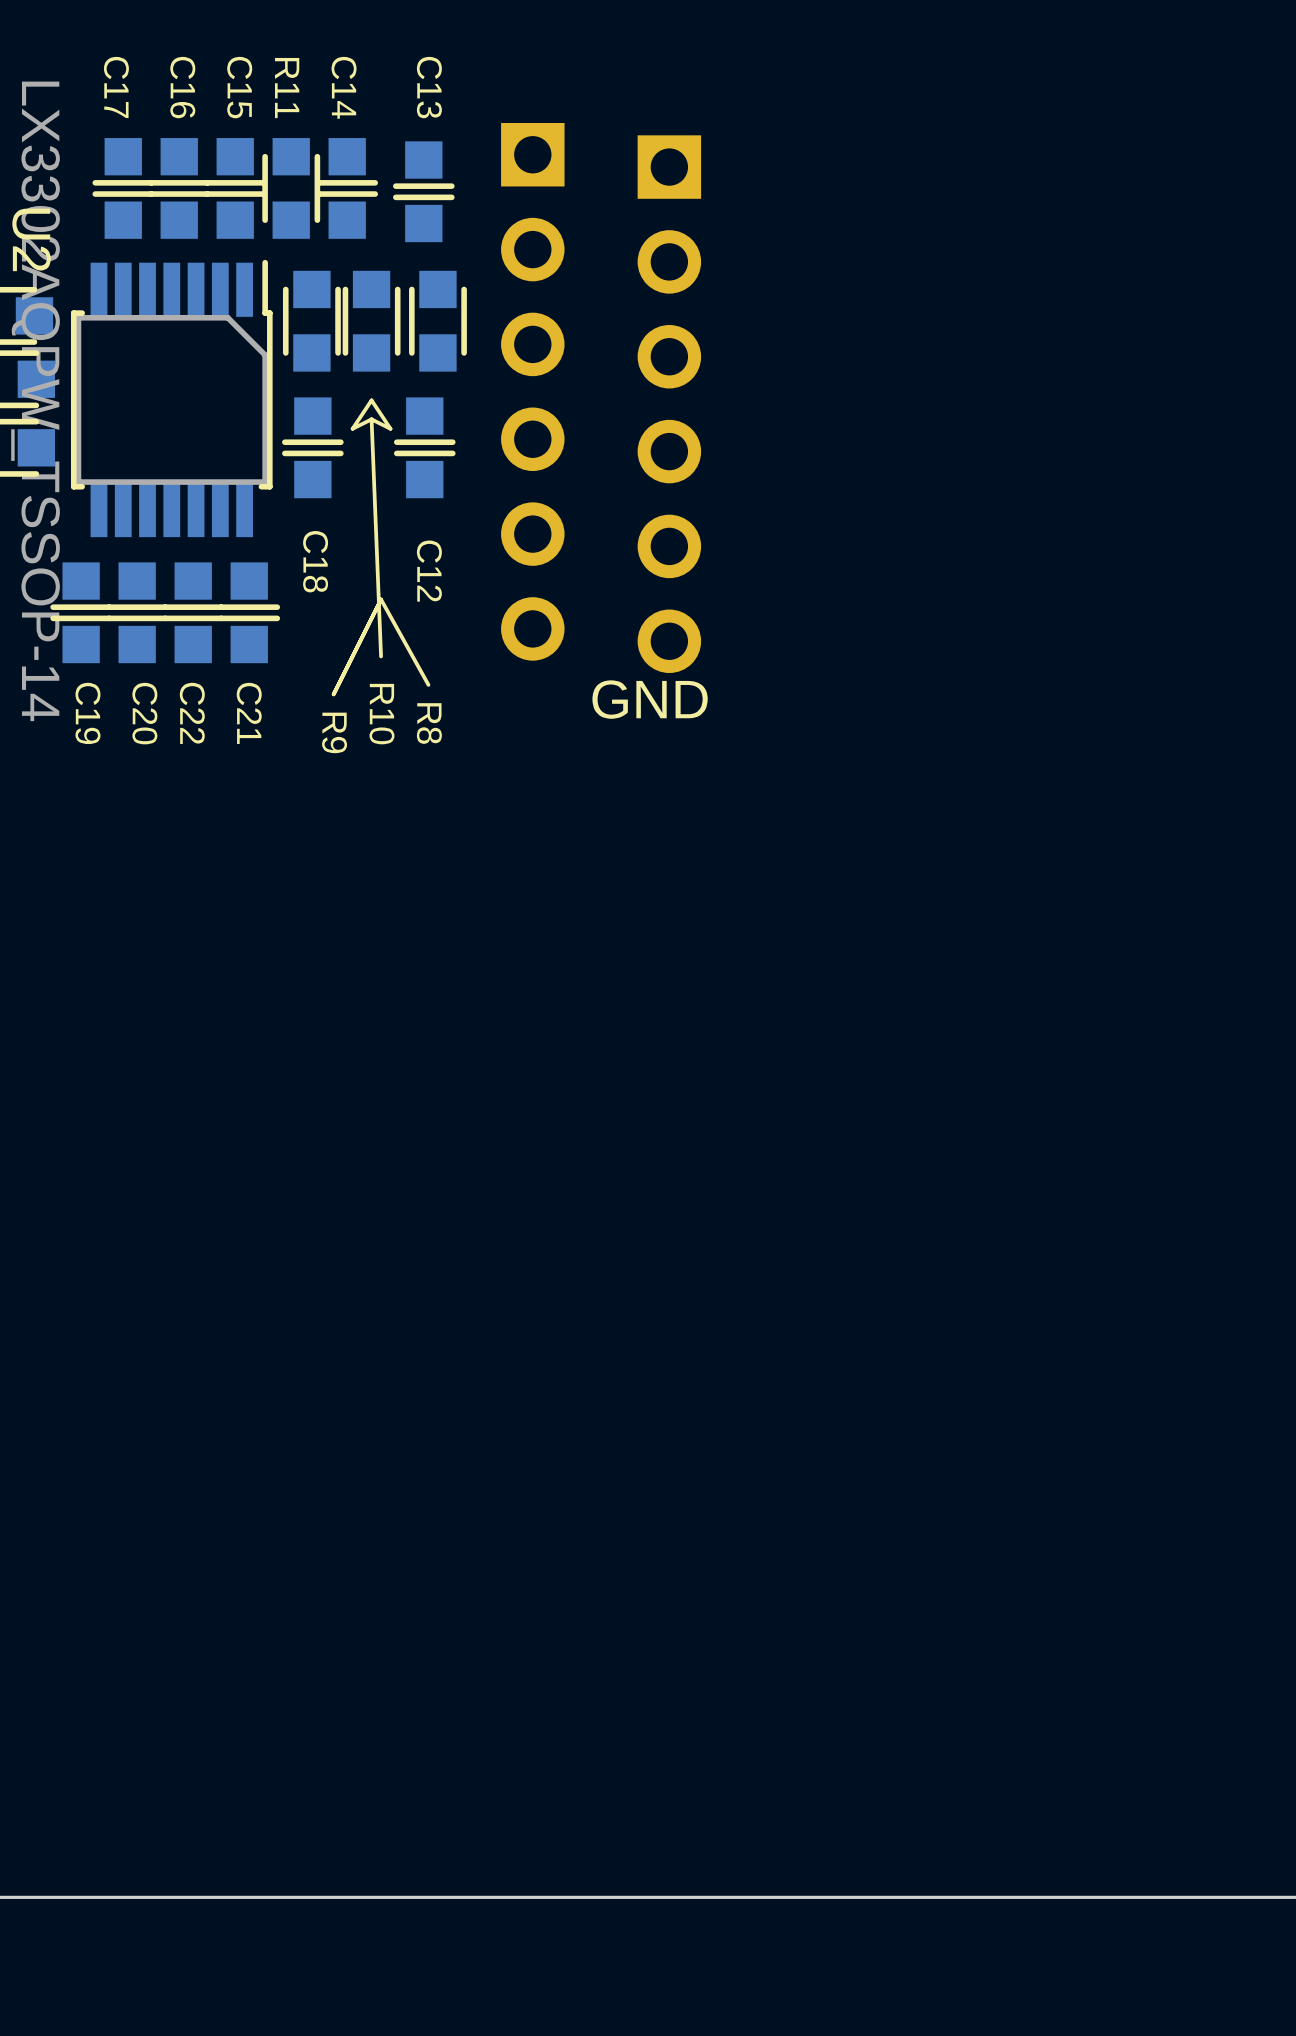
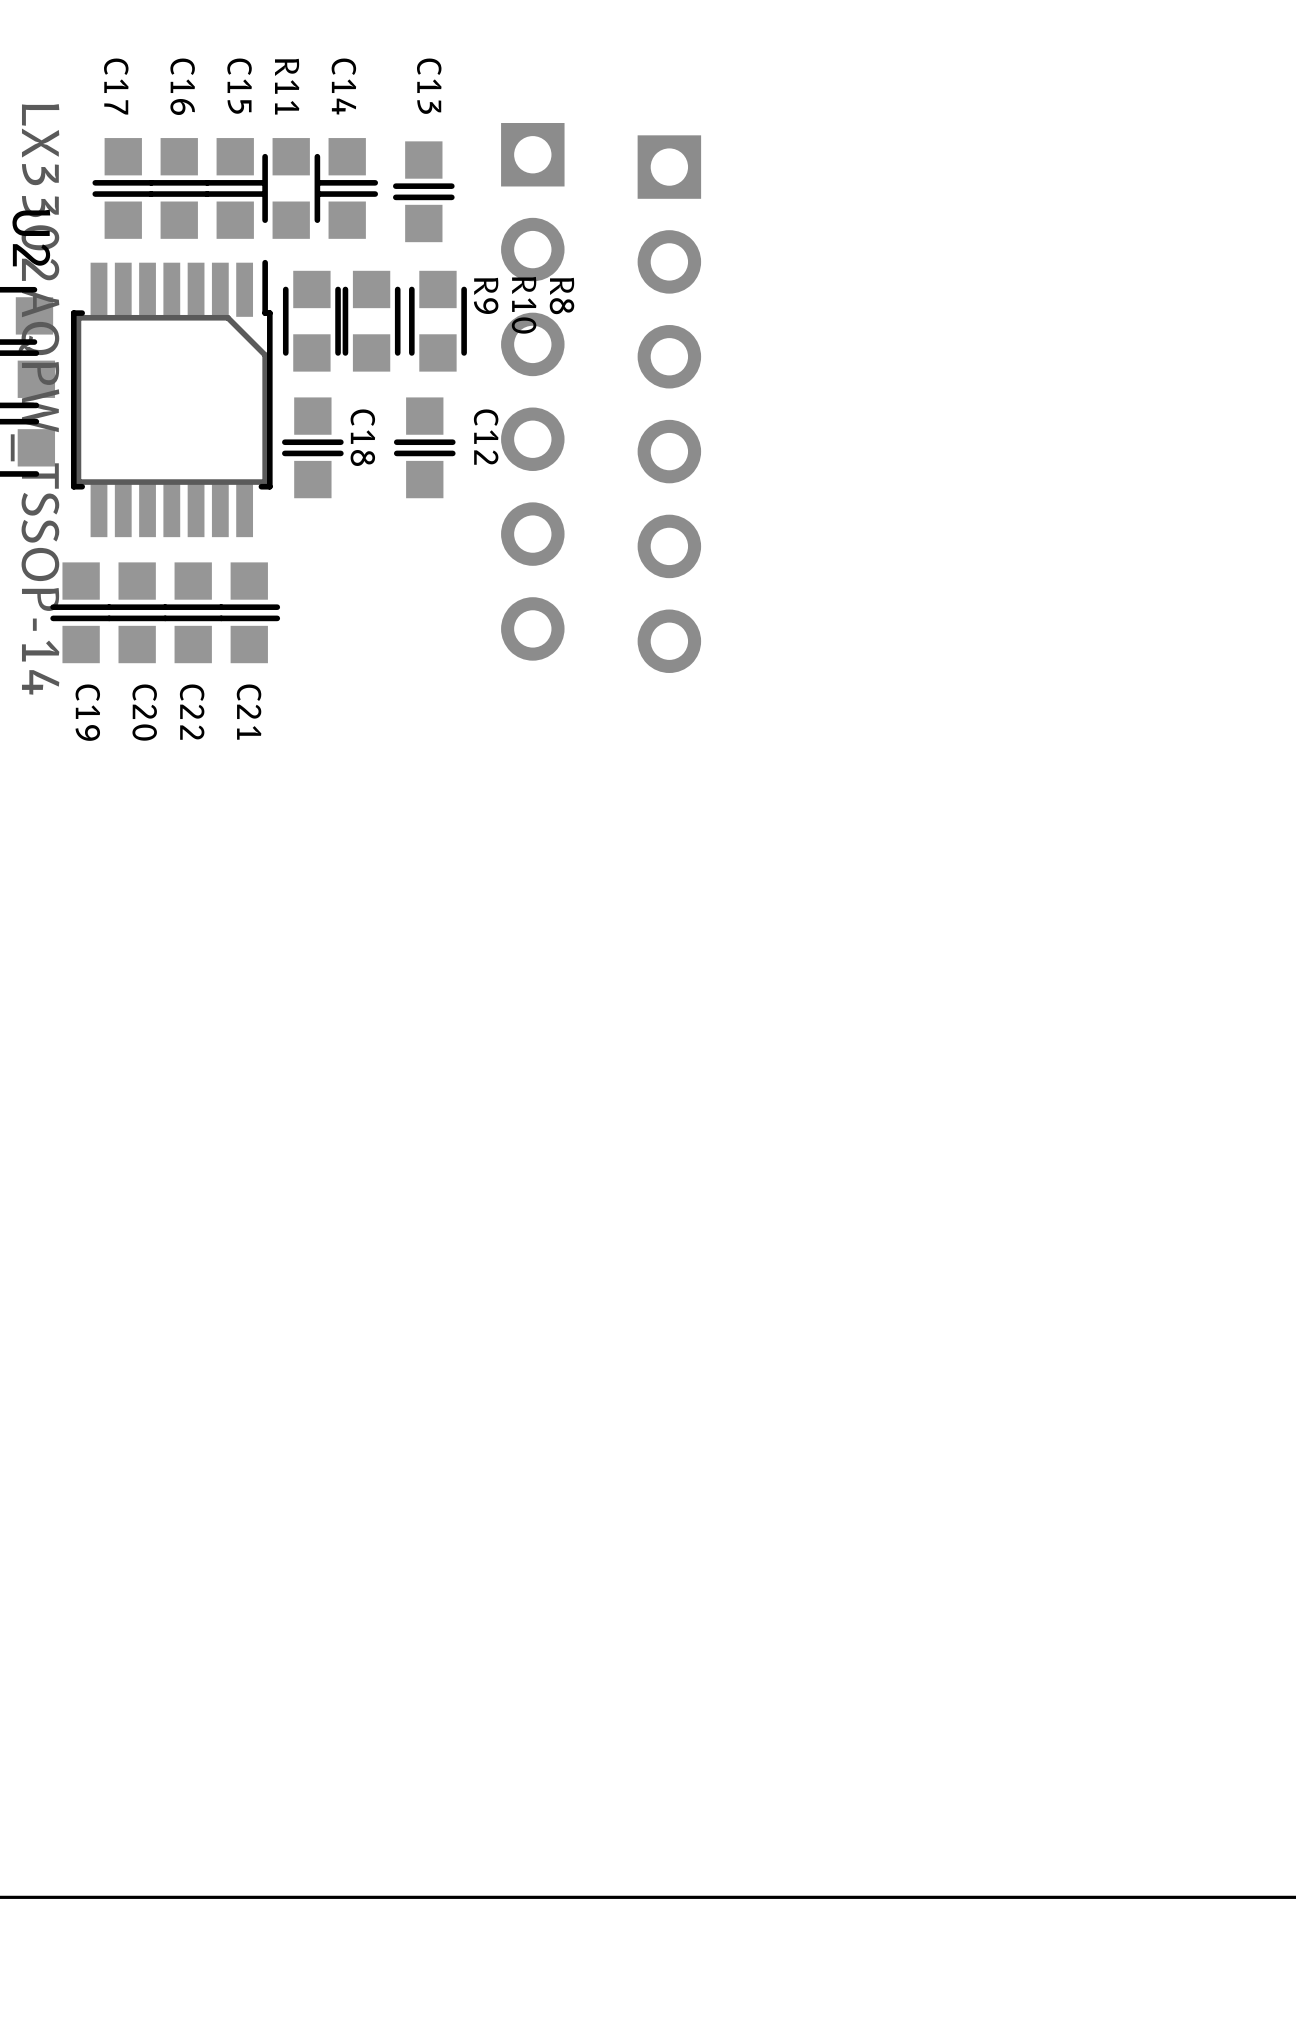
line: (371, 419) (352, 428) (371, 400) (390, 428) (371, 419) -> none
line: (371, 419) (381, 656) -> none
C18 name position: C18 (315, 561) -> C18 (362, 437)
C12 name position: C12 (429, 571) -> C12 (486, 437)
line: (428, 684) (381, 599) (333, 694) -> none
text: GND (650, 699) -> none
R10 name position: R10 (381, 714) -> R10 (524, 305)
R8 name position: R8 (429, 723) -> R8 (562, 295)
R9 name position: R9 (334, 732) -> R9 (486, 295)

